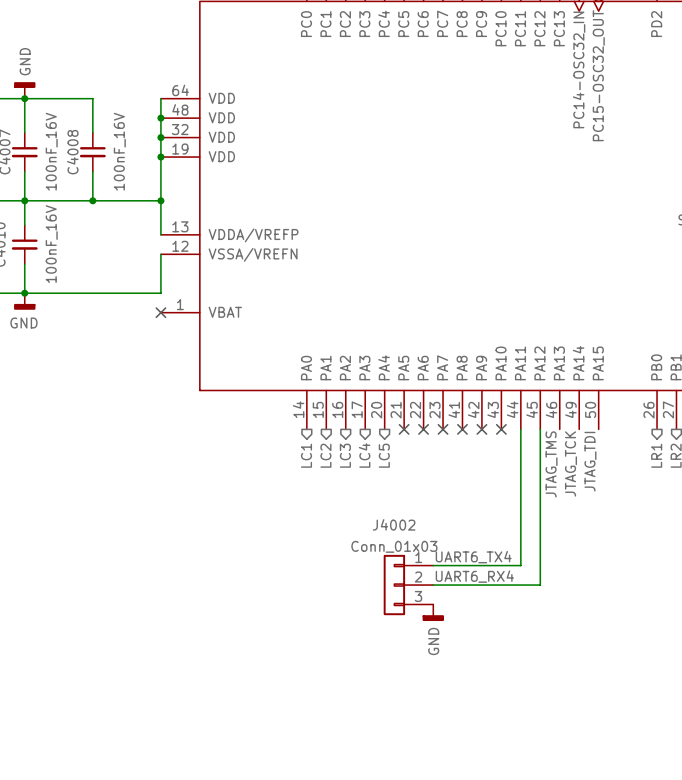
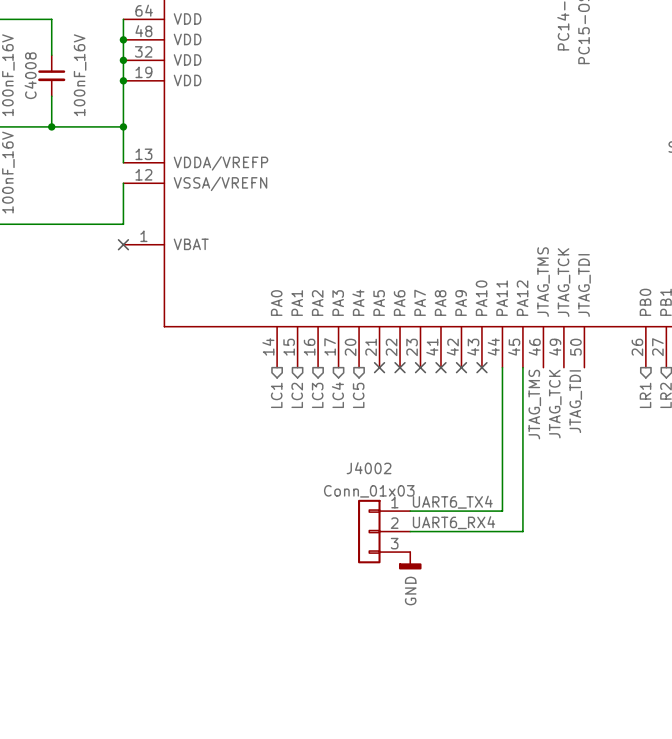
part pin name: PA13 (559, 363) -> JTAG_TMS (543, 282)
part pin name: PA14 (578, 363) -> JTAG_TCK (564, 282)
part pin name: PA15 (598, 363) -> JTAG_TDI (584, 285)

